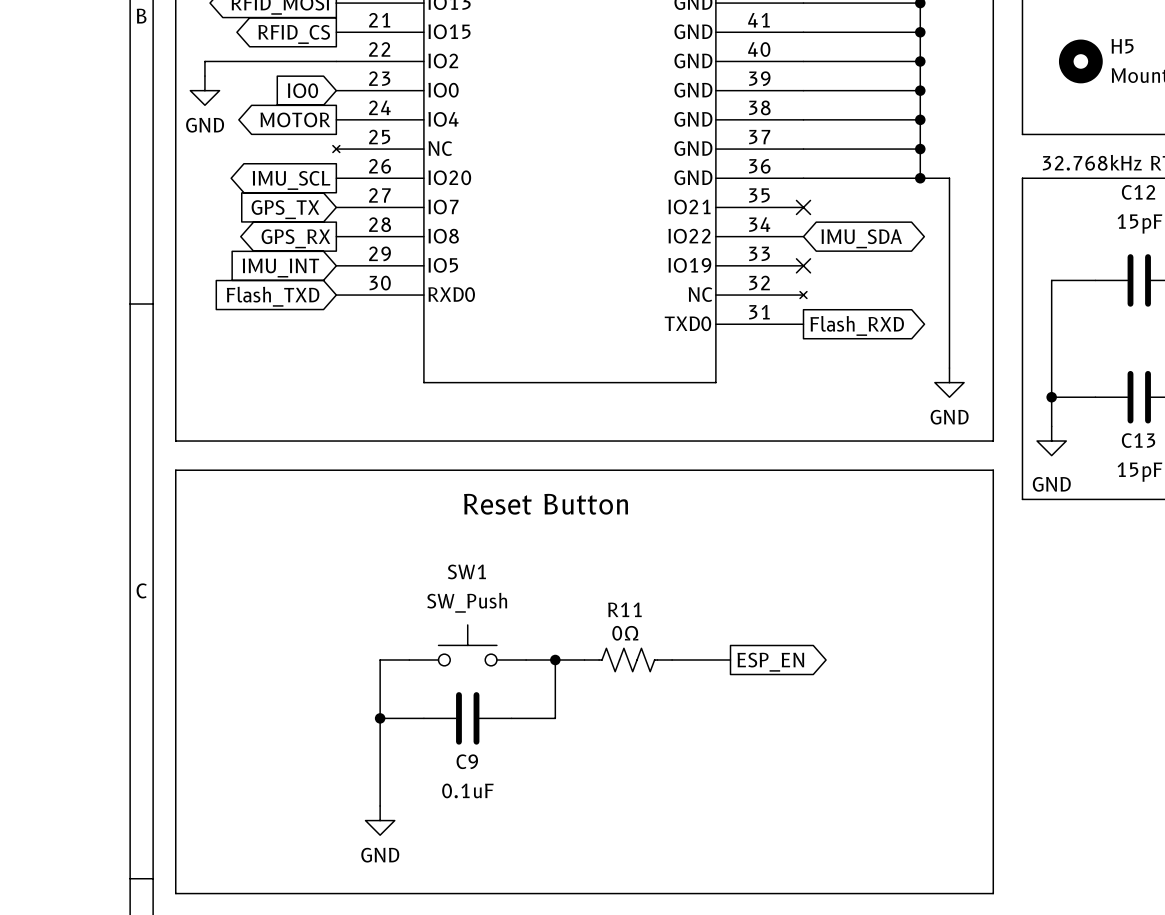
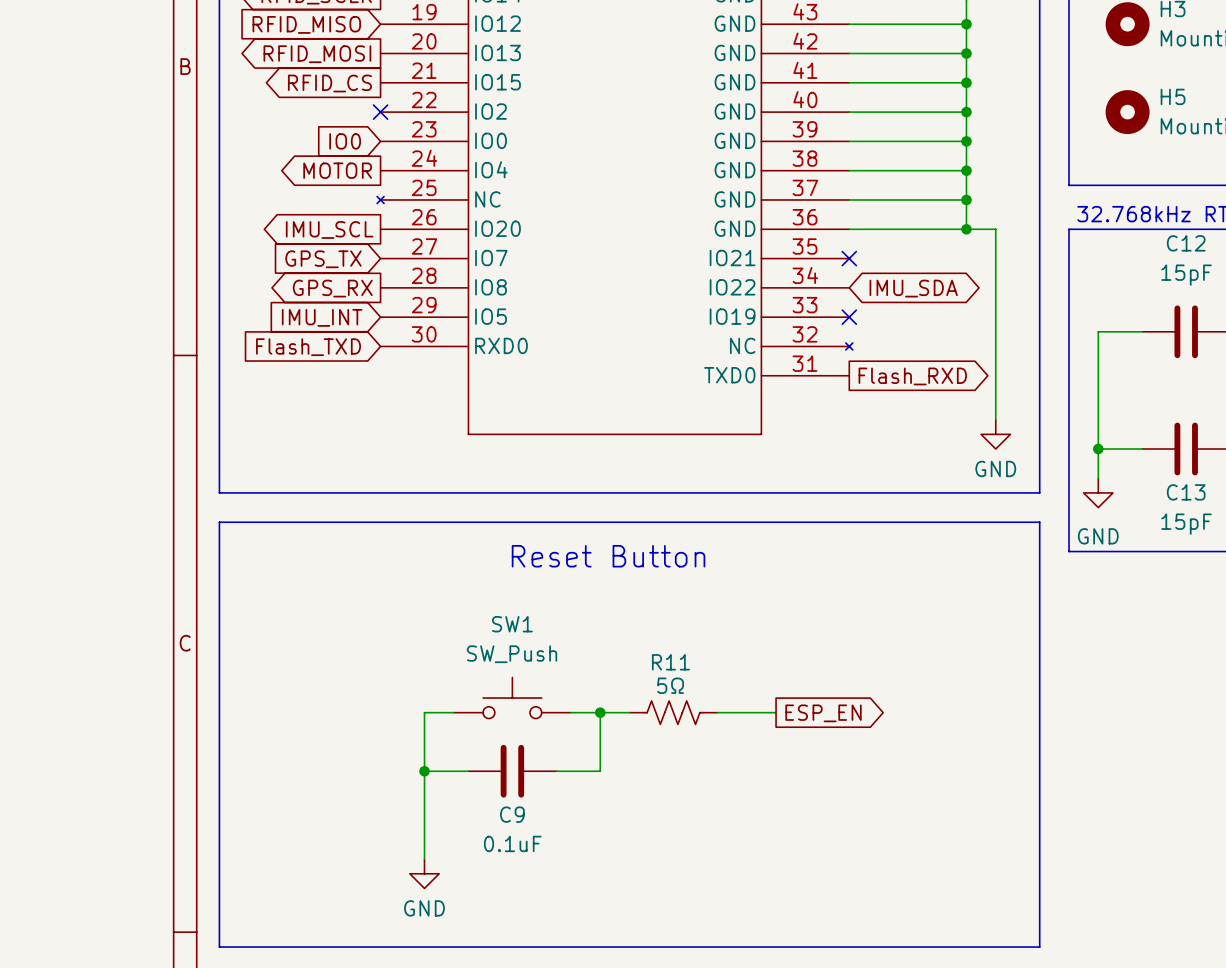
wire: (336, 61) (204, 61) (204, 76) -> none
no-connect mark: none -> (380, 112)
power symbol: GND (204, 90) -> none
R11 value: 0Ω (625, 633) -> 5Ω (670, 685)

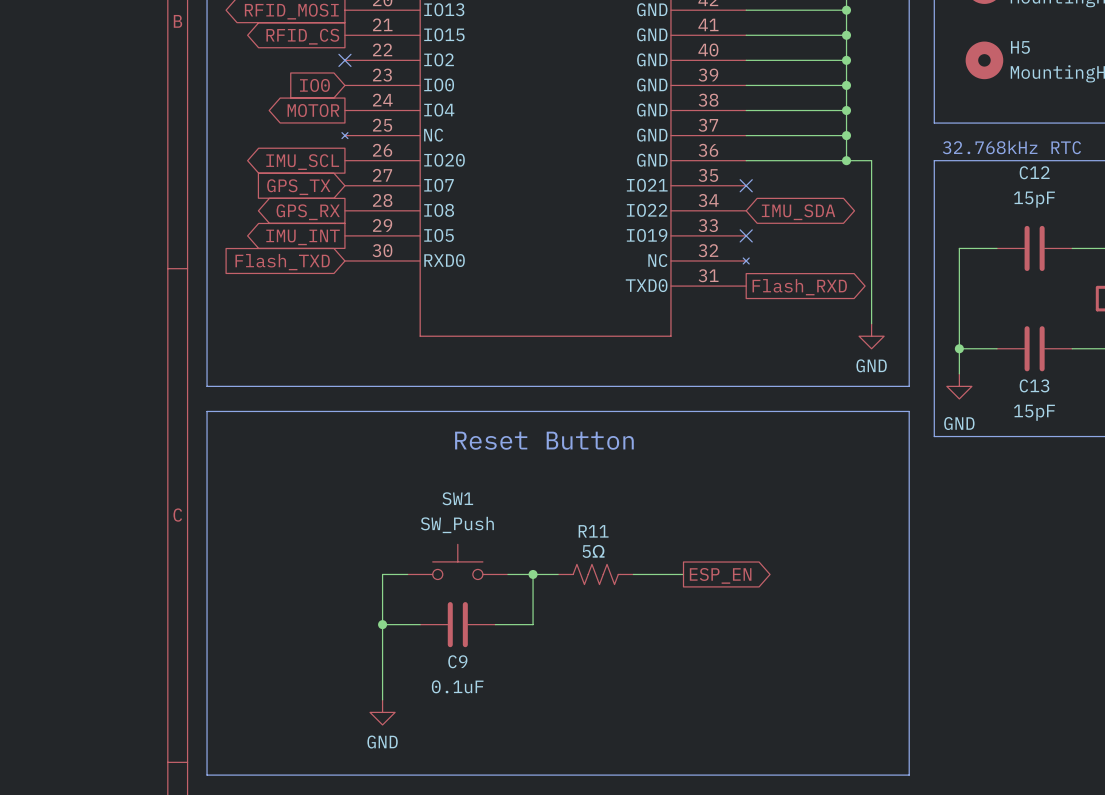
global label shape: input (322, 317) -> output (303, 237)

